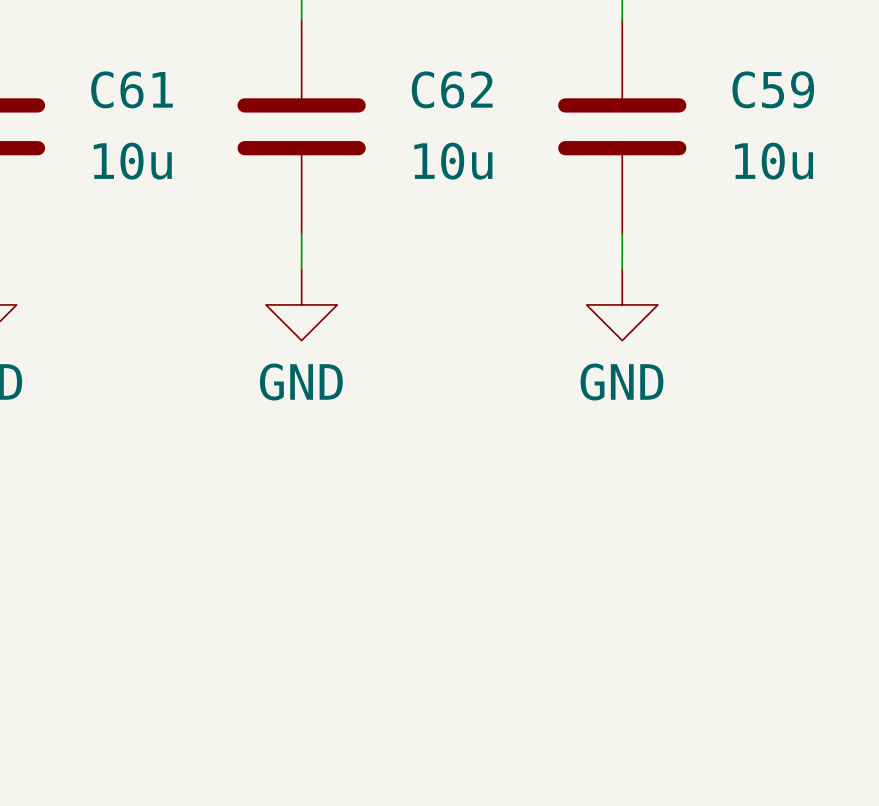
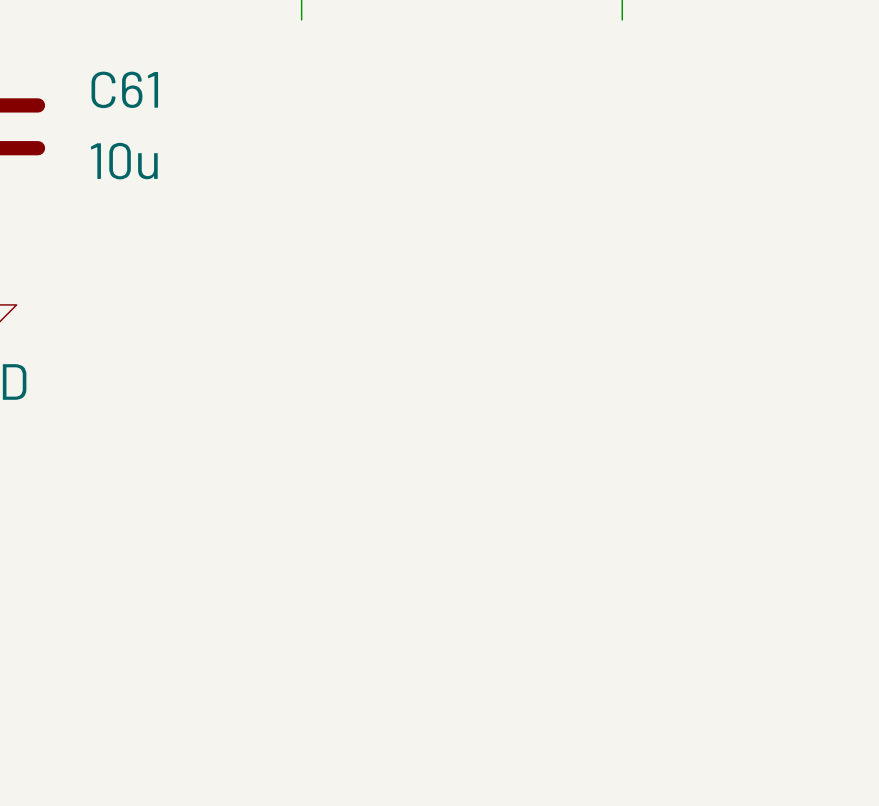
C62: 10u (301, 126) -> none
C59: 10u (622, 126) -> none
wire: (301, 233) (301, 269) -> none
wire: (622, 233) (622, 269) -> none
power symbol: GND (301, 304) -> none
power symbol: GND (622, 304) -> none

